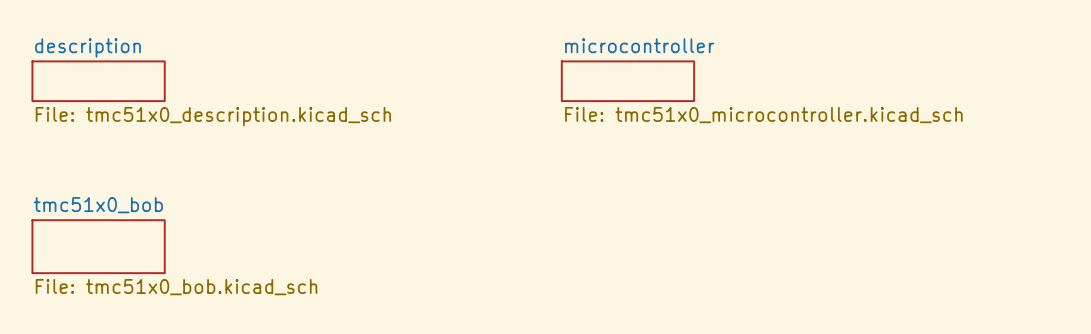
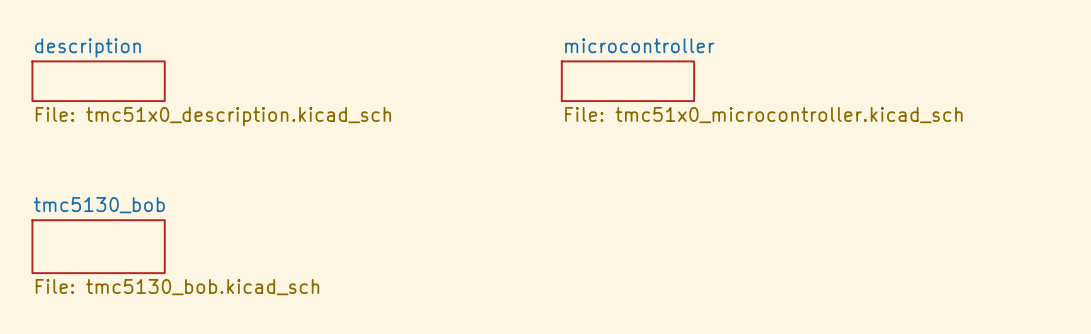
sheet tmc51x0_bob name: tmc51x0_bob (98, 205) -> tmc5130_bob (99, 205)
sheet tmc51x0_bob value: File: tmc51x0_bob.kicad_sch (176, 287) -> File: tmc5130_bob.kicad_sch (177, 287)

